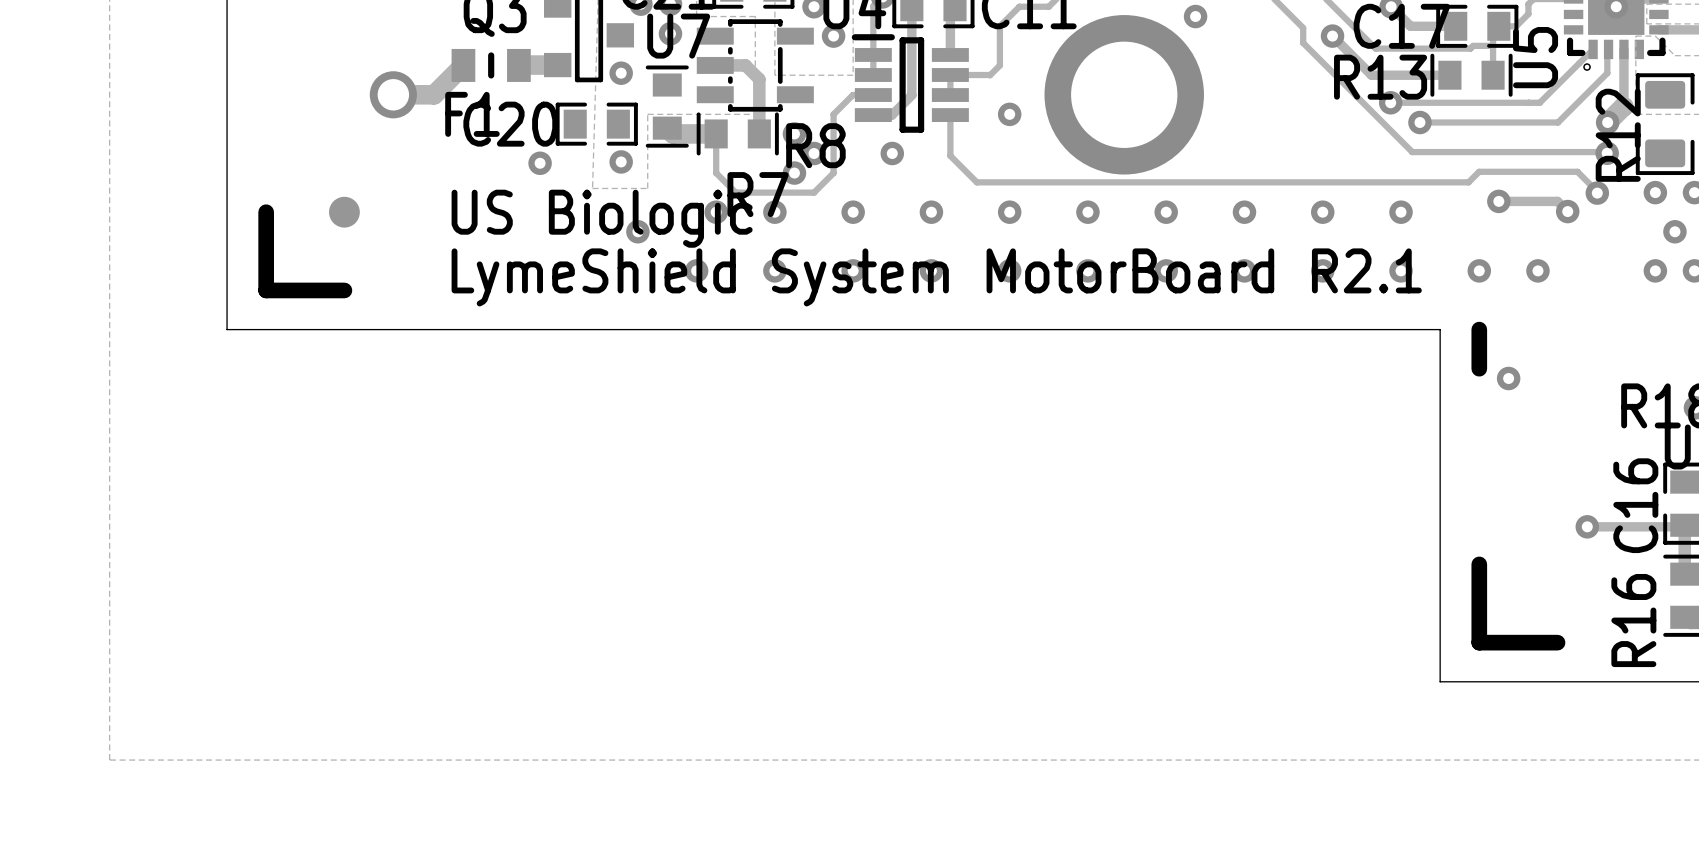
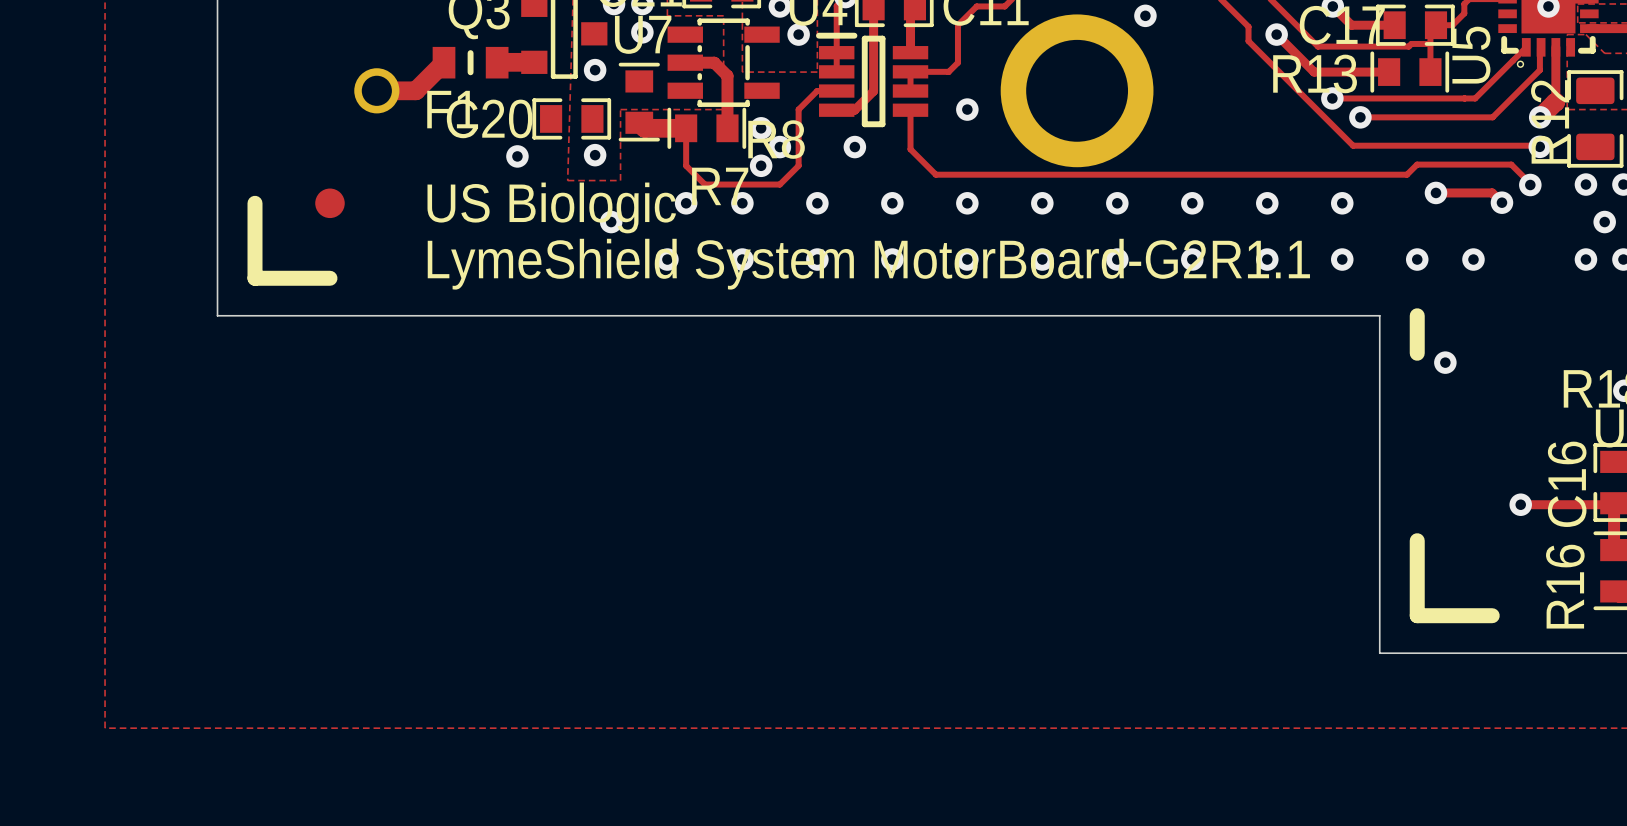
text: LymeShield System MotorBoard R2.1 (936, 277) -> LymeShield System MotorBoard-G2R1.1 (868, 264)

